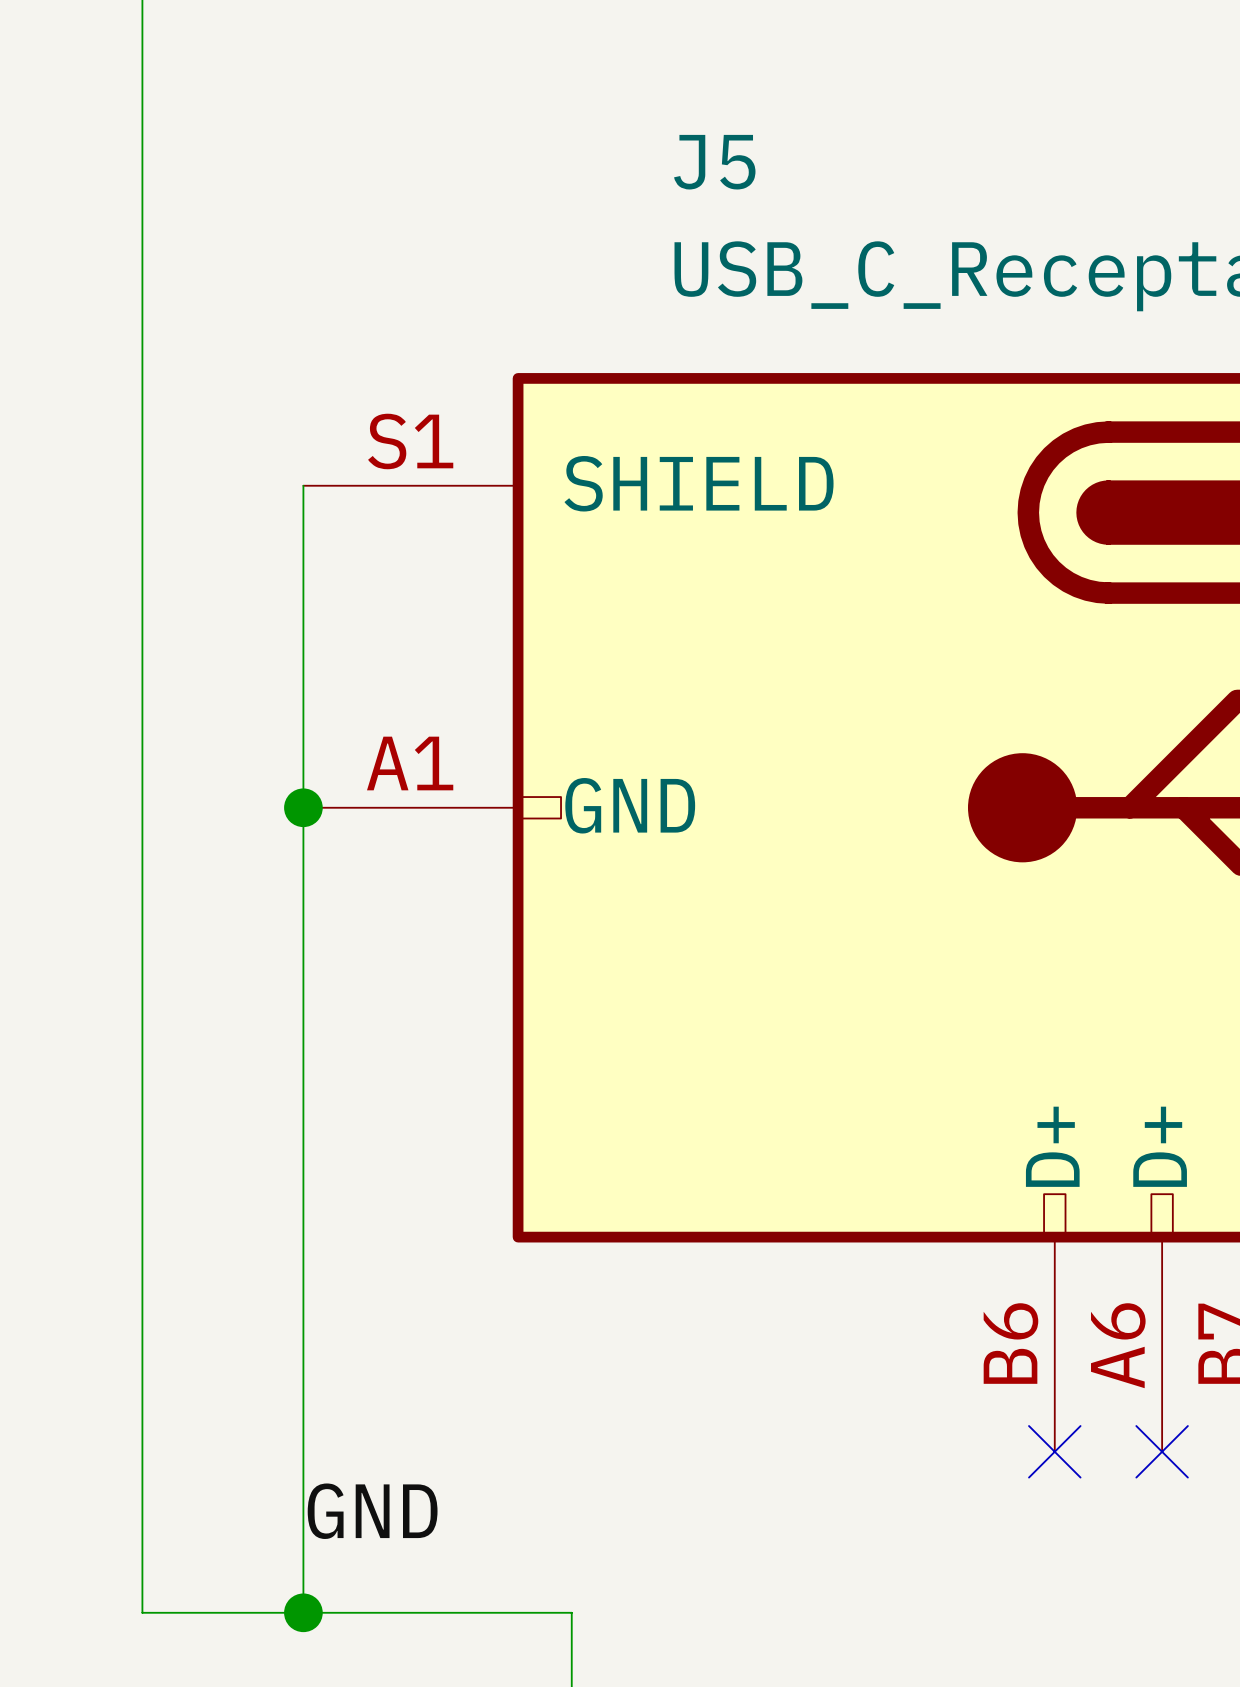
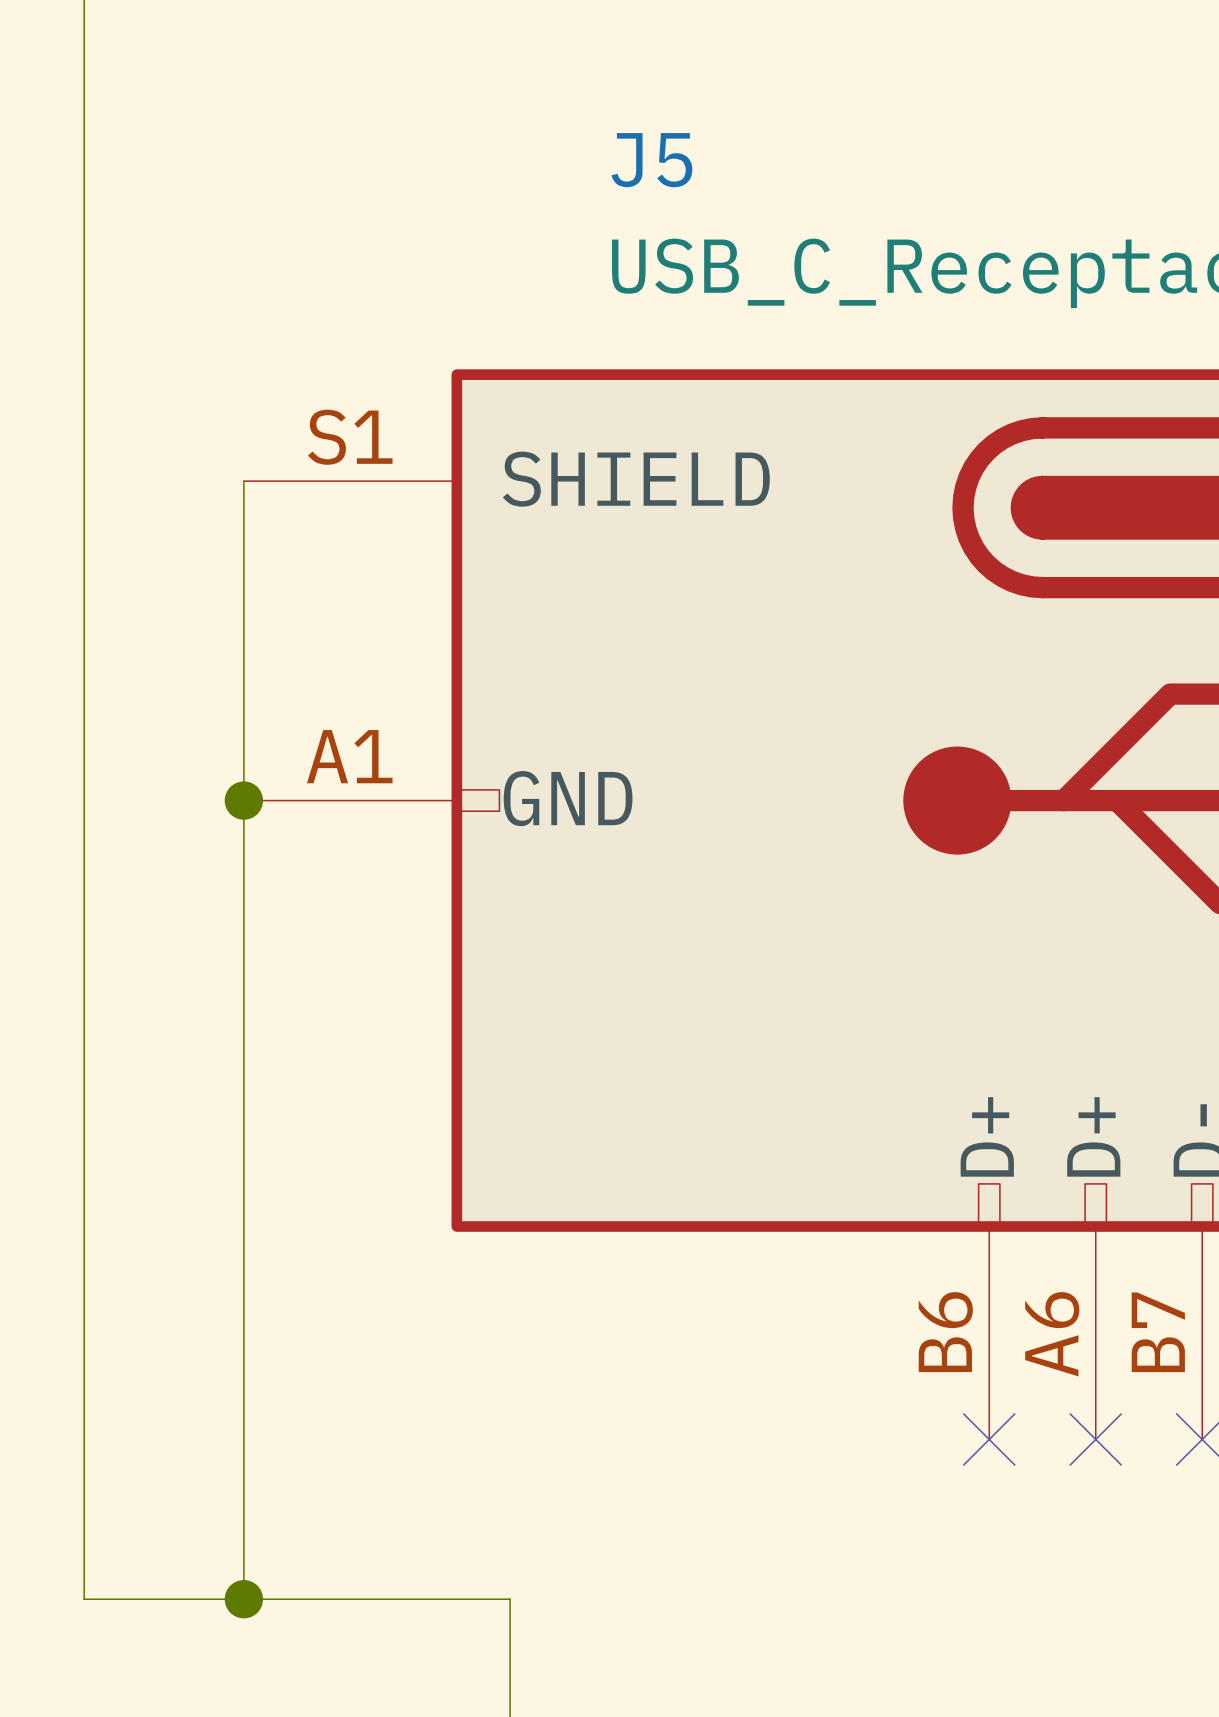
label: GND (372, 1511) -> none

